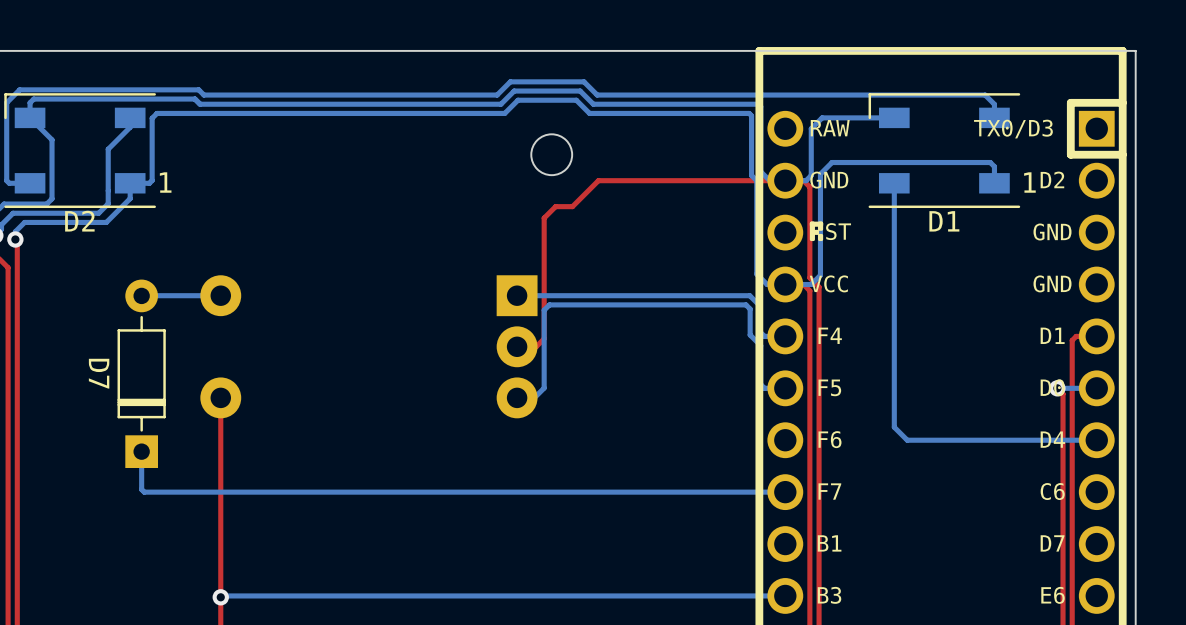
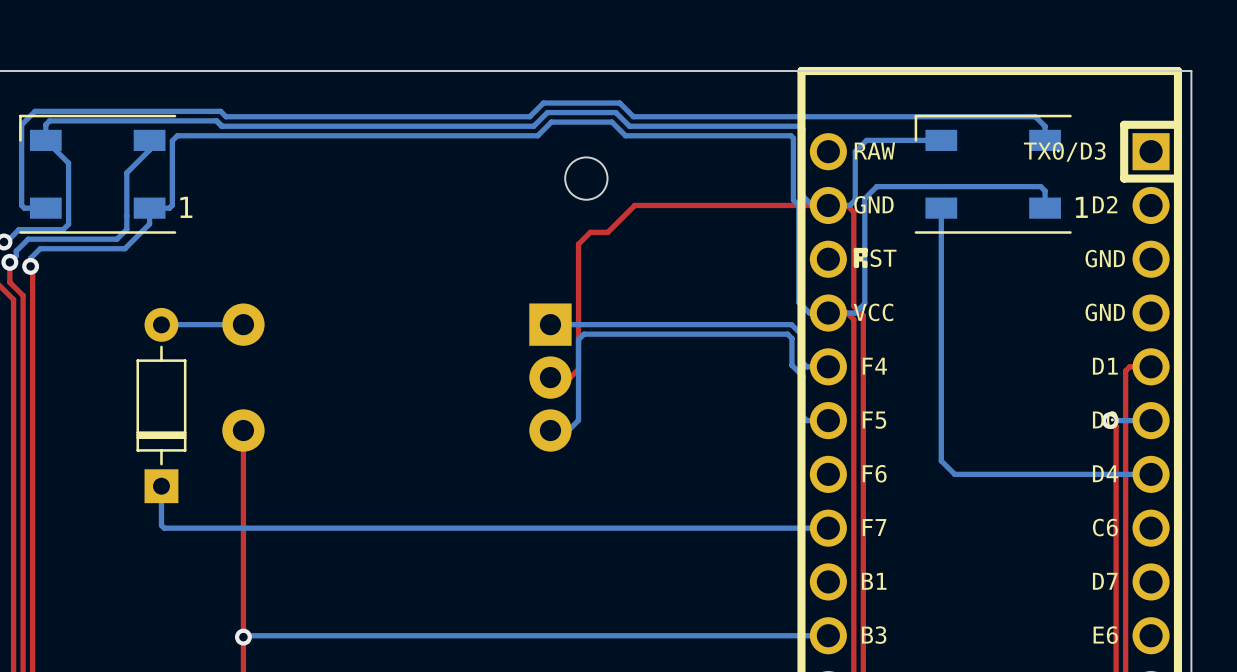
D2 name: D2 (79, 221) -> none
D1 name: D1 (944, 221) -> none
D7 name: D7 (99, 373) -> none

